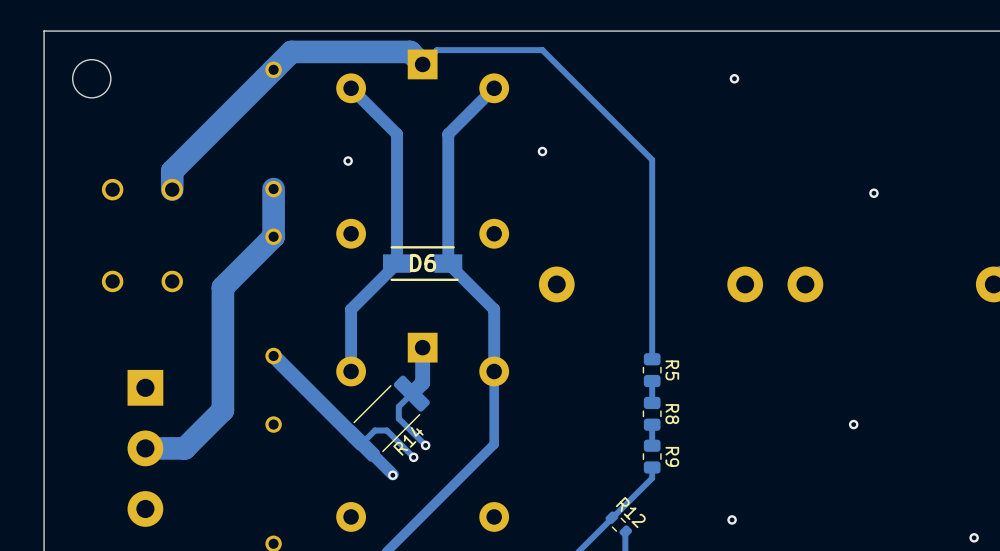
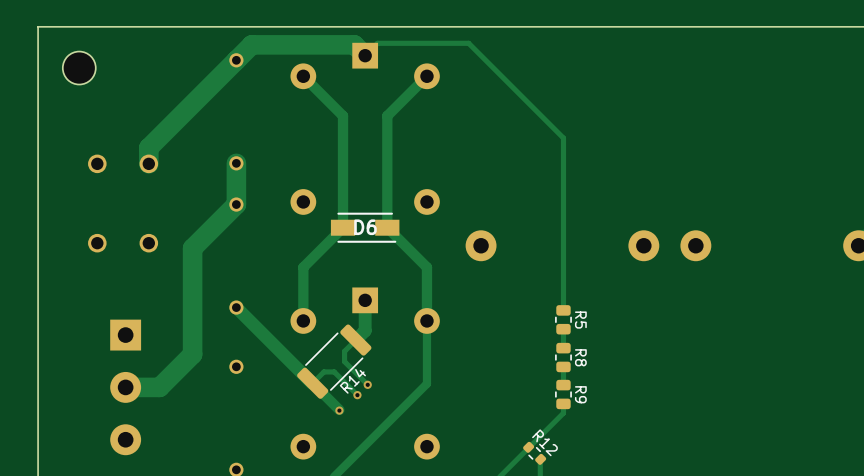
via: (734, 78) -> none
via: (542, 151) -> none
via: (348, 161) -> none
via: (873, 193) -> none
via: (853, 424) -> none
via: (732, 519) -> none
via: (974, 537) -> none

